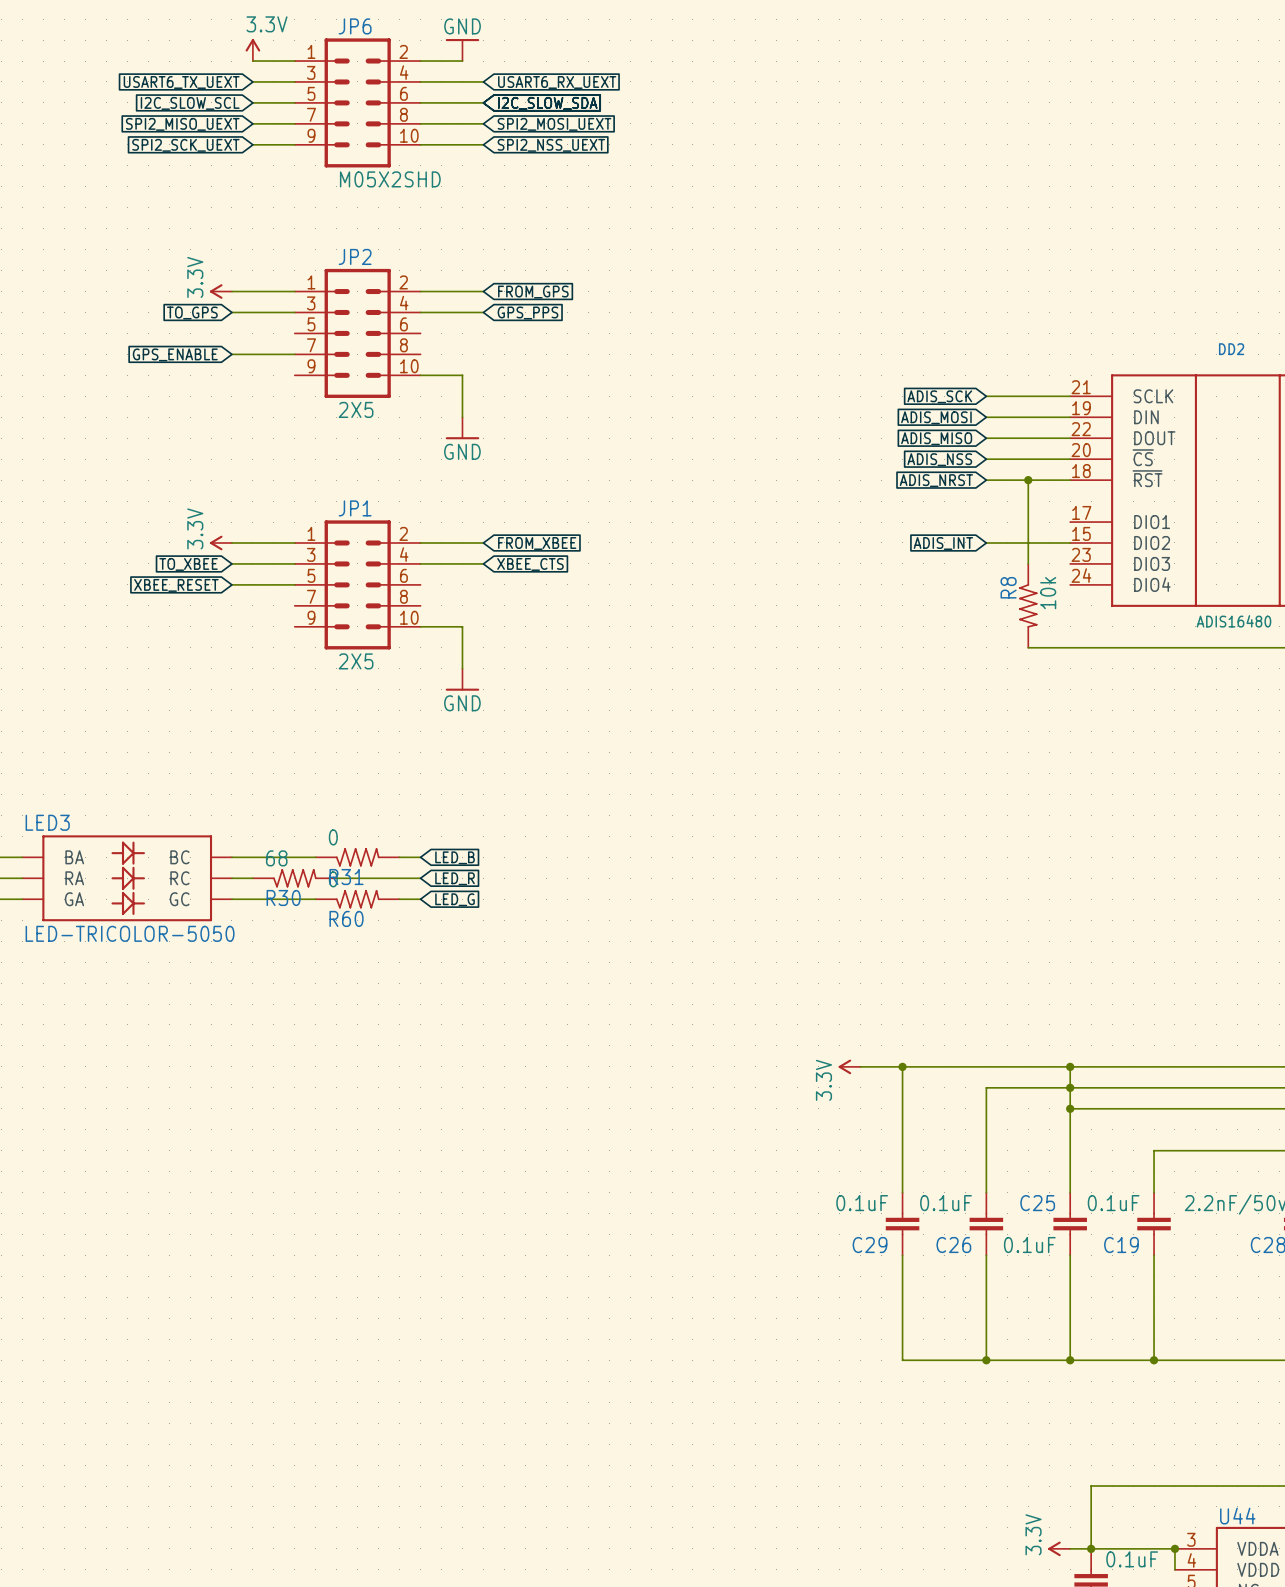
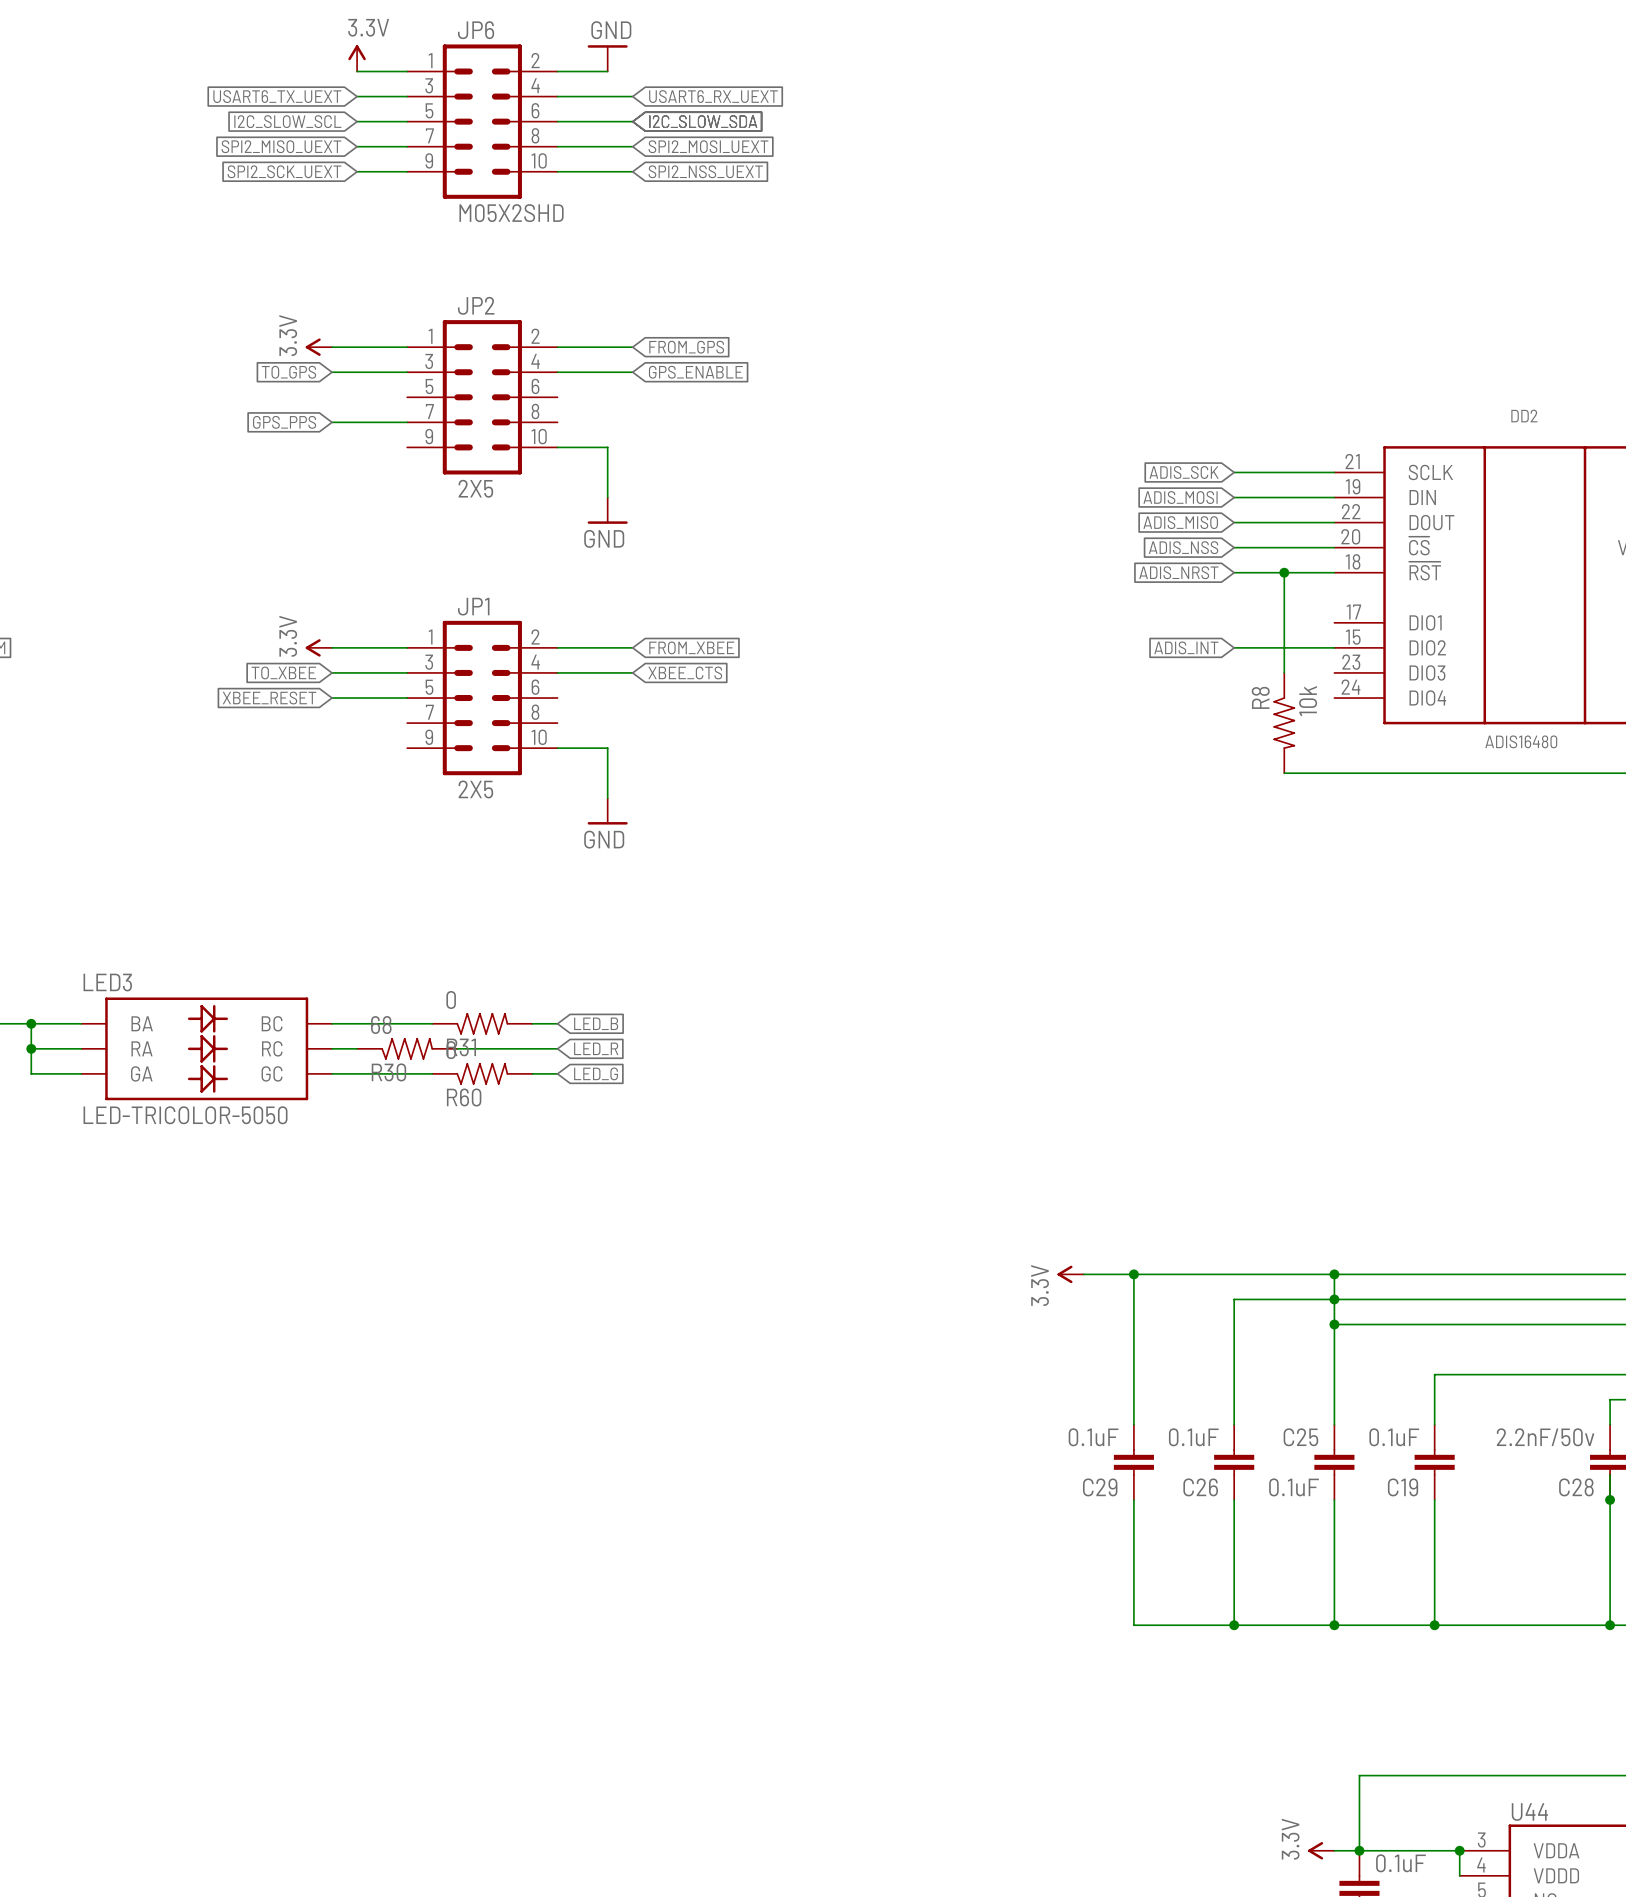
global label: GPS_PPS (527, 312) -> GPS_ENABLE (695, 372)
global label: GPS_ENABLE (175, 354) -> GPS_PPS (284, 422)

